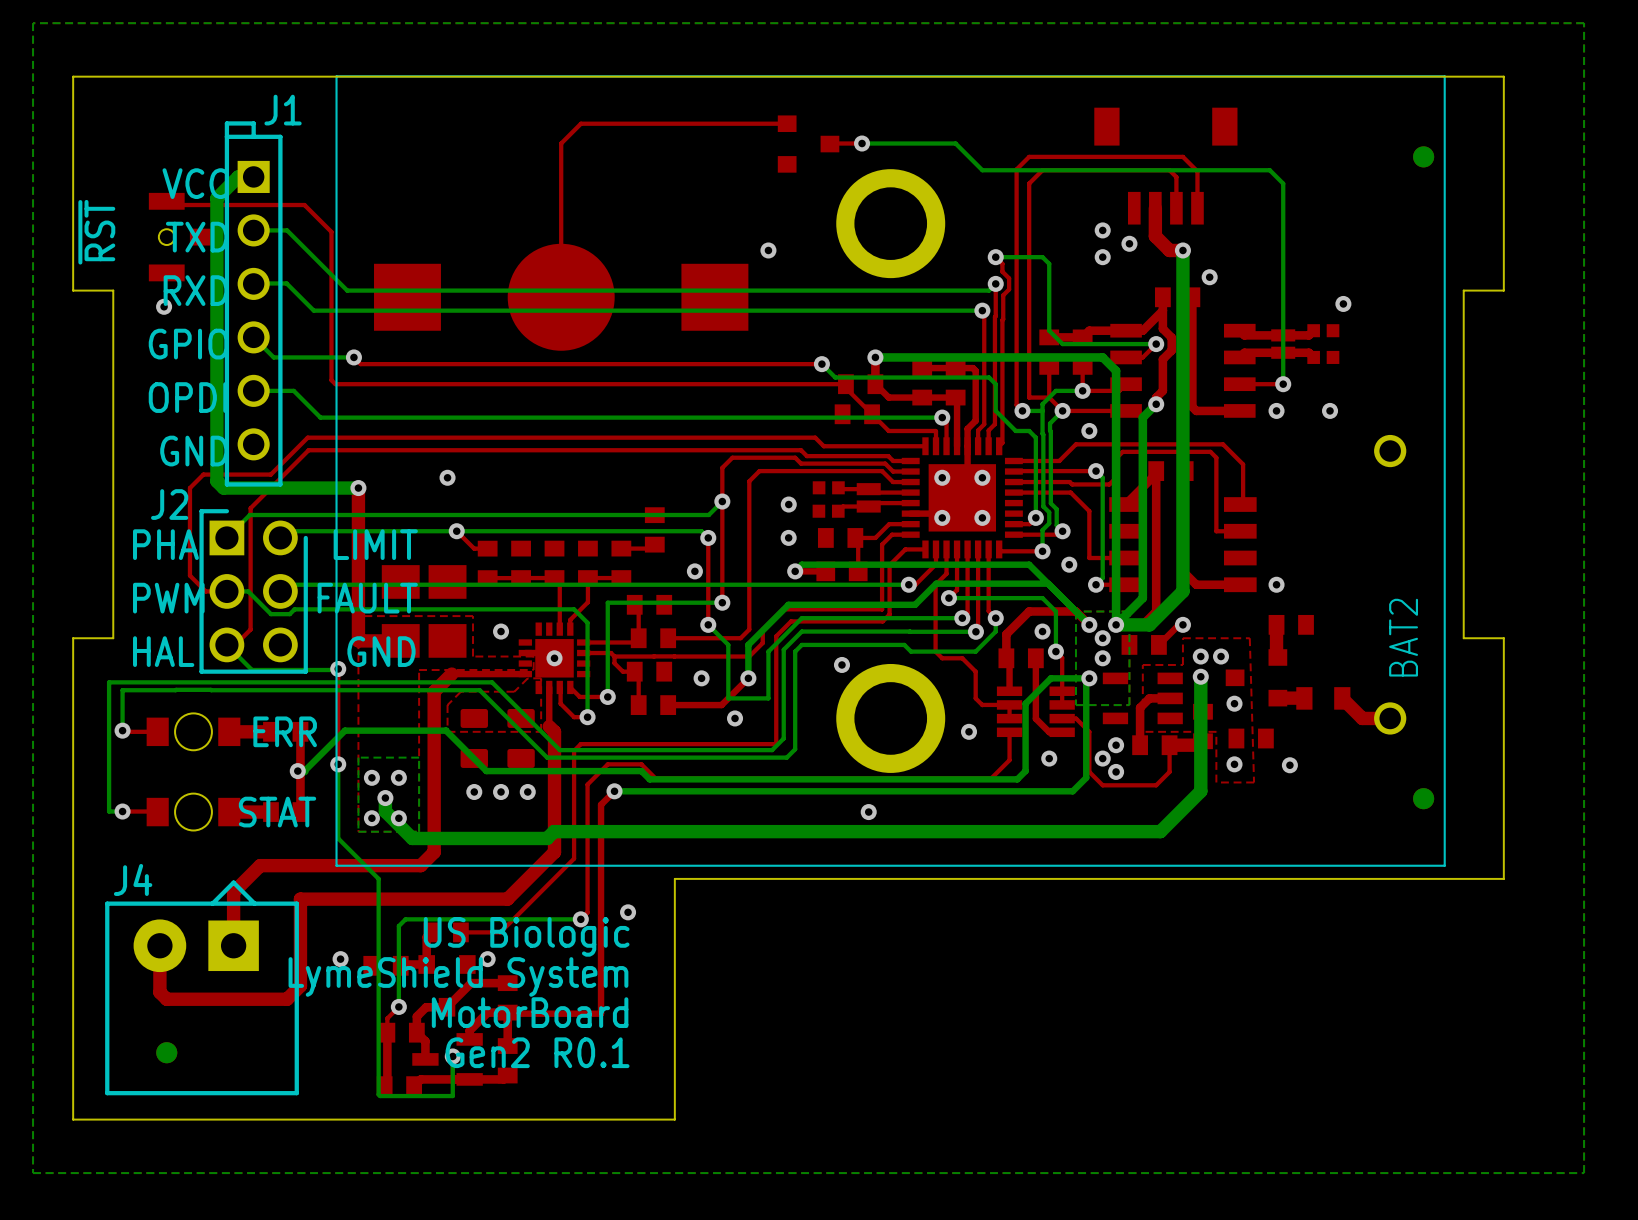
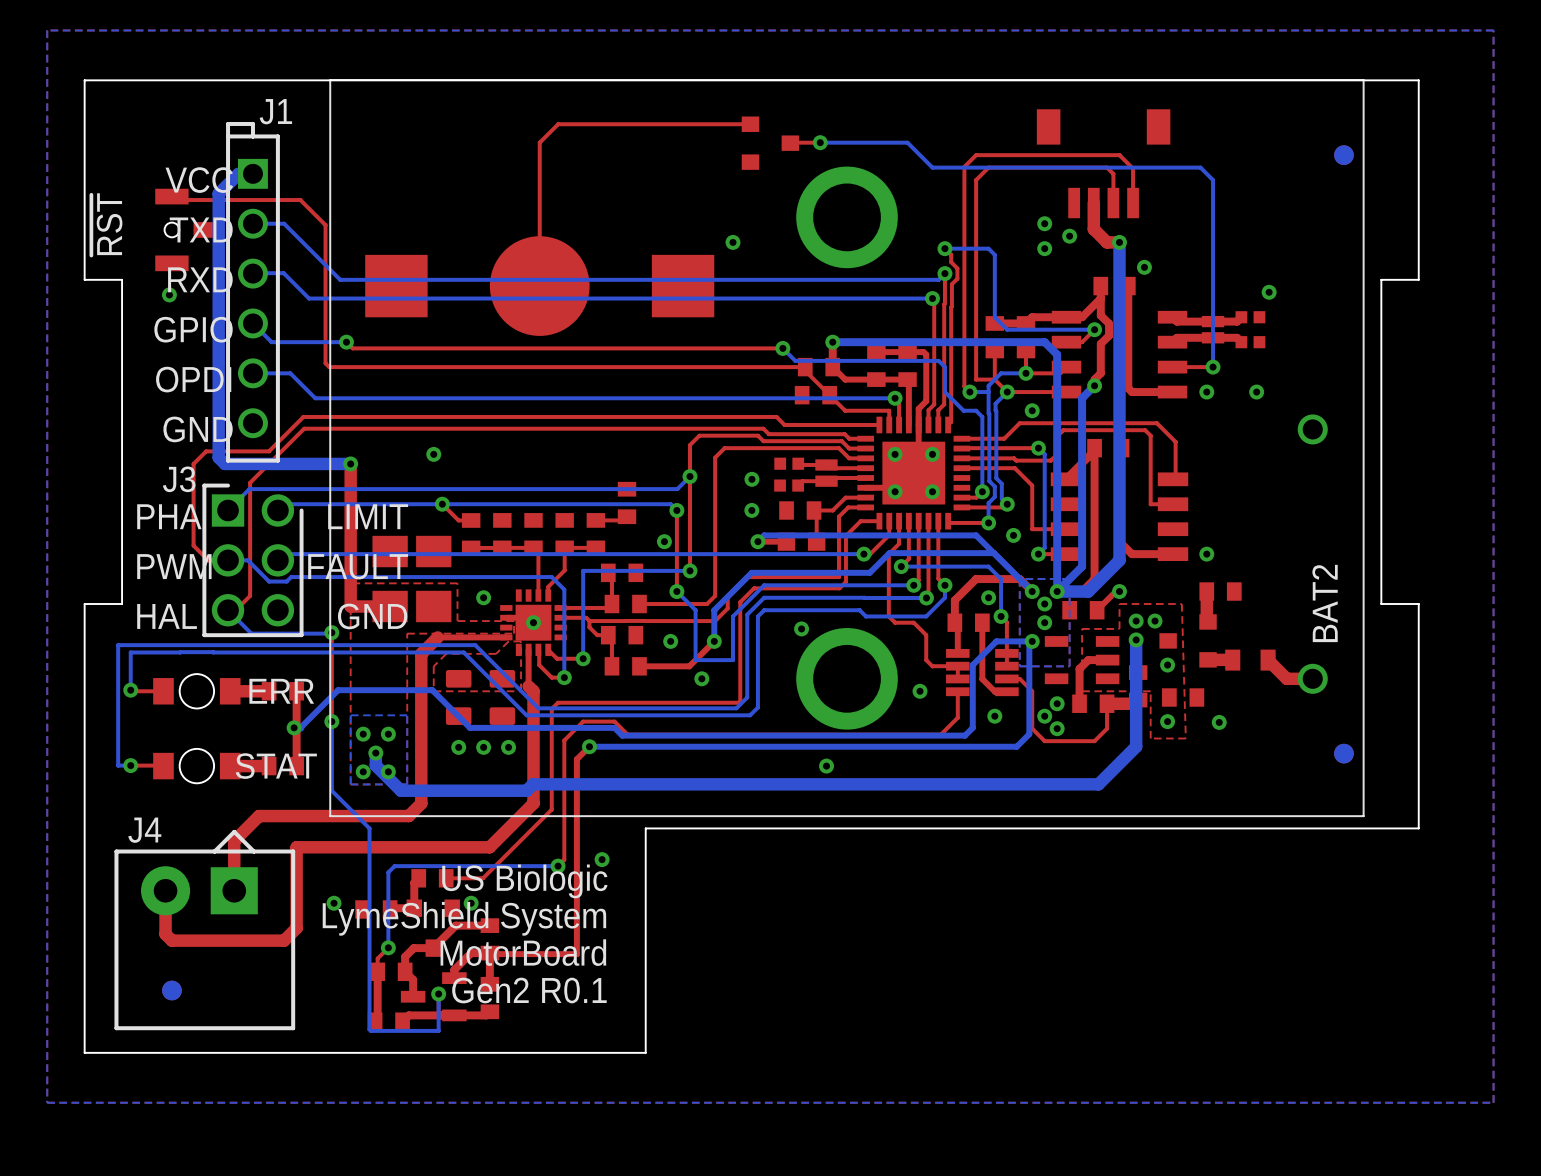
J2 name: J2 (169, 504) -> J3 (179, 479)

